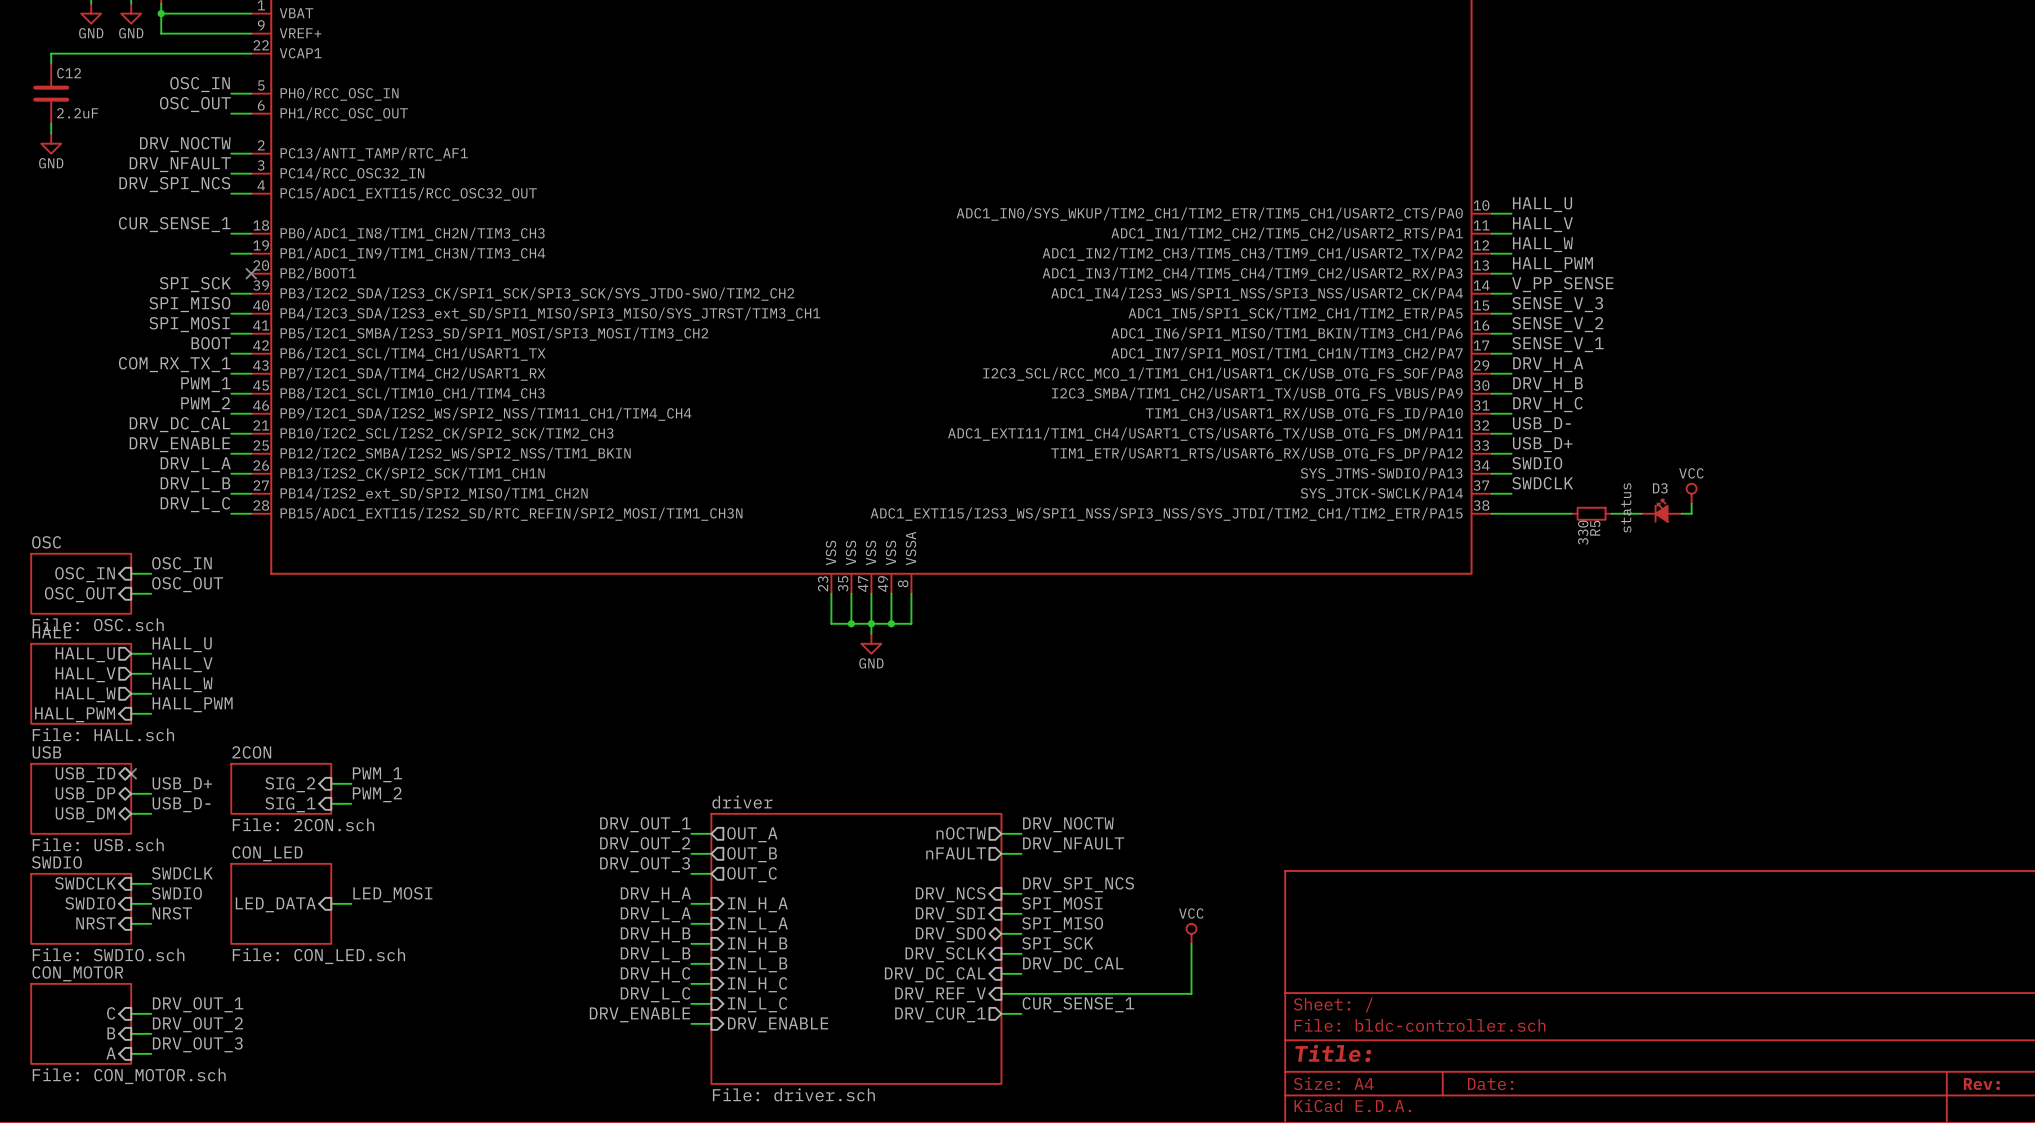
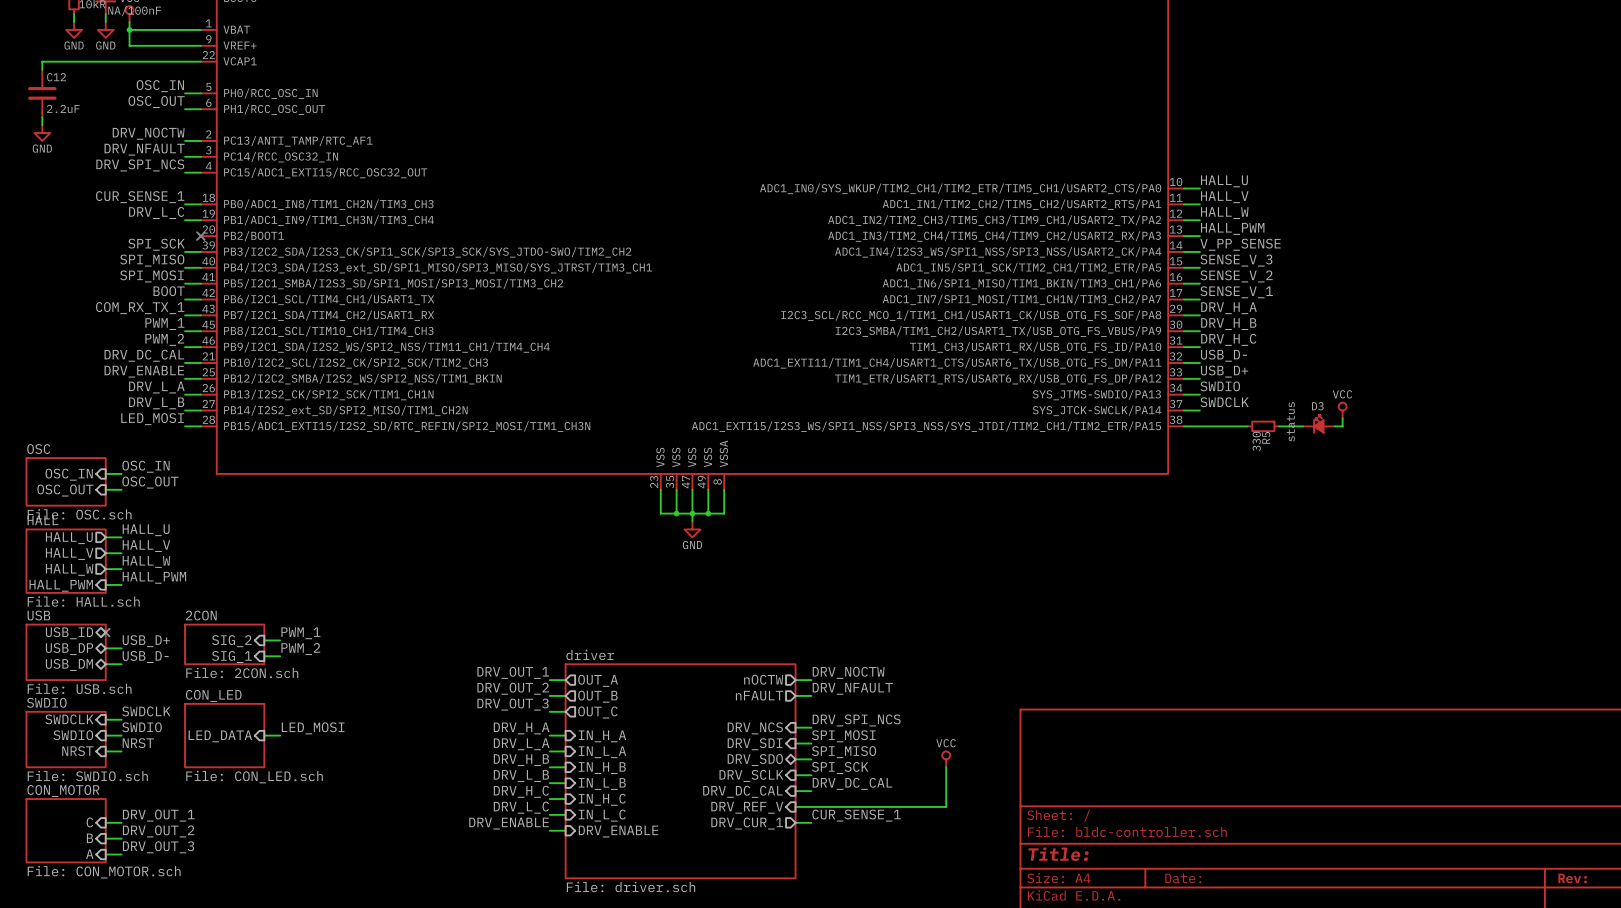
label: none -> DRV_L_C (156, 213)
label: DRV_L_C (195, 504) -> LED_MOSI (152, 419)

